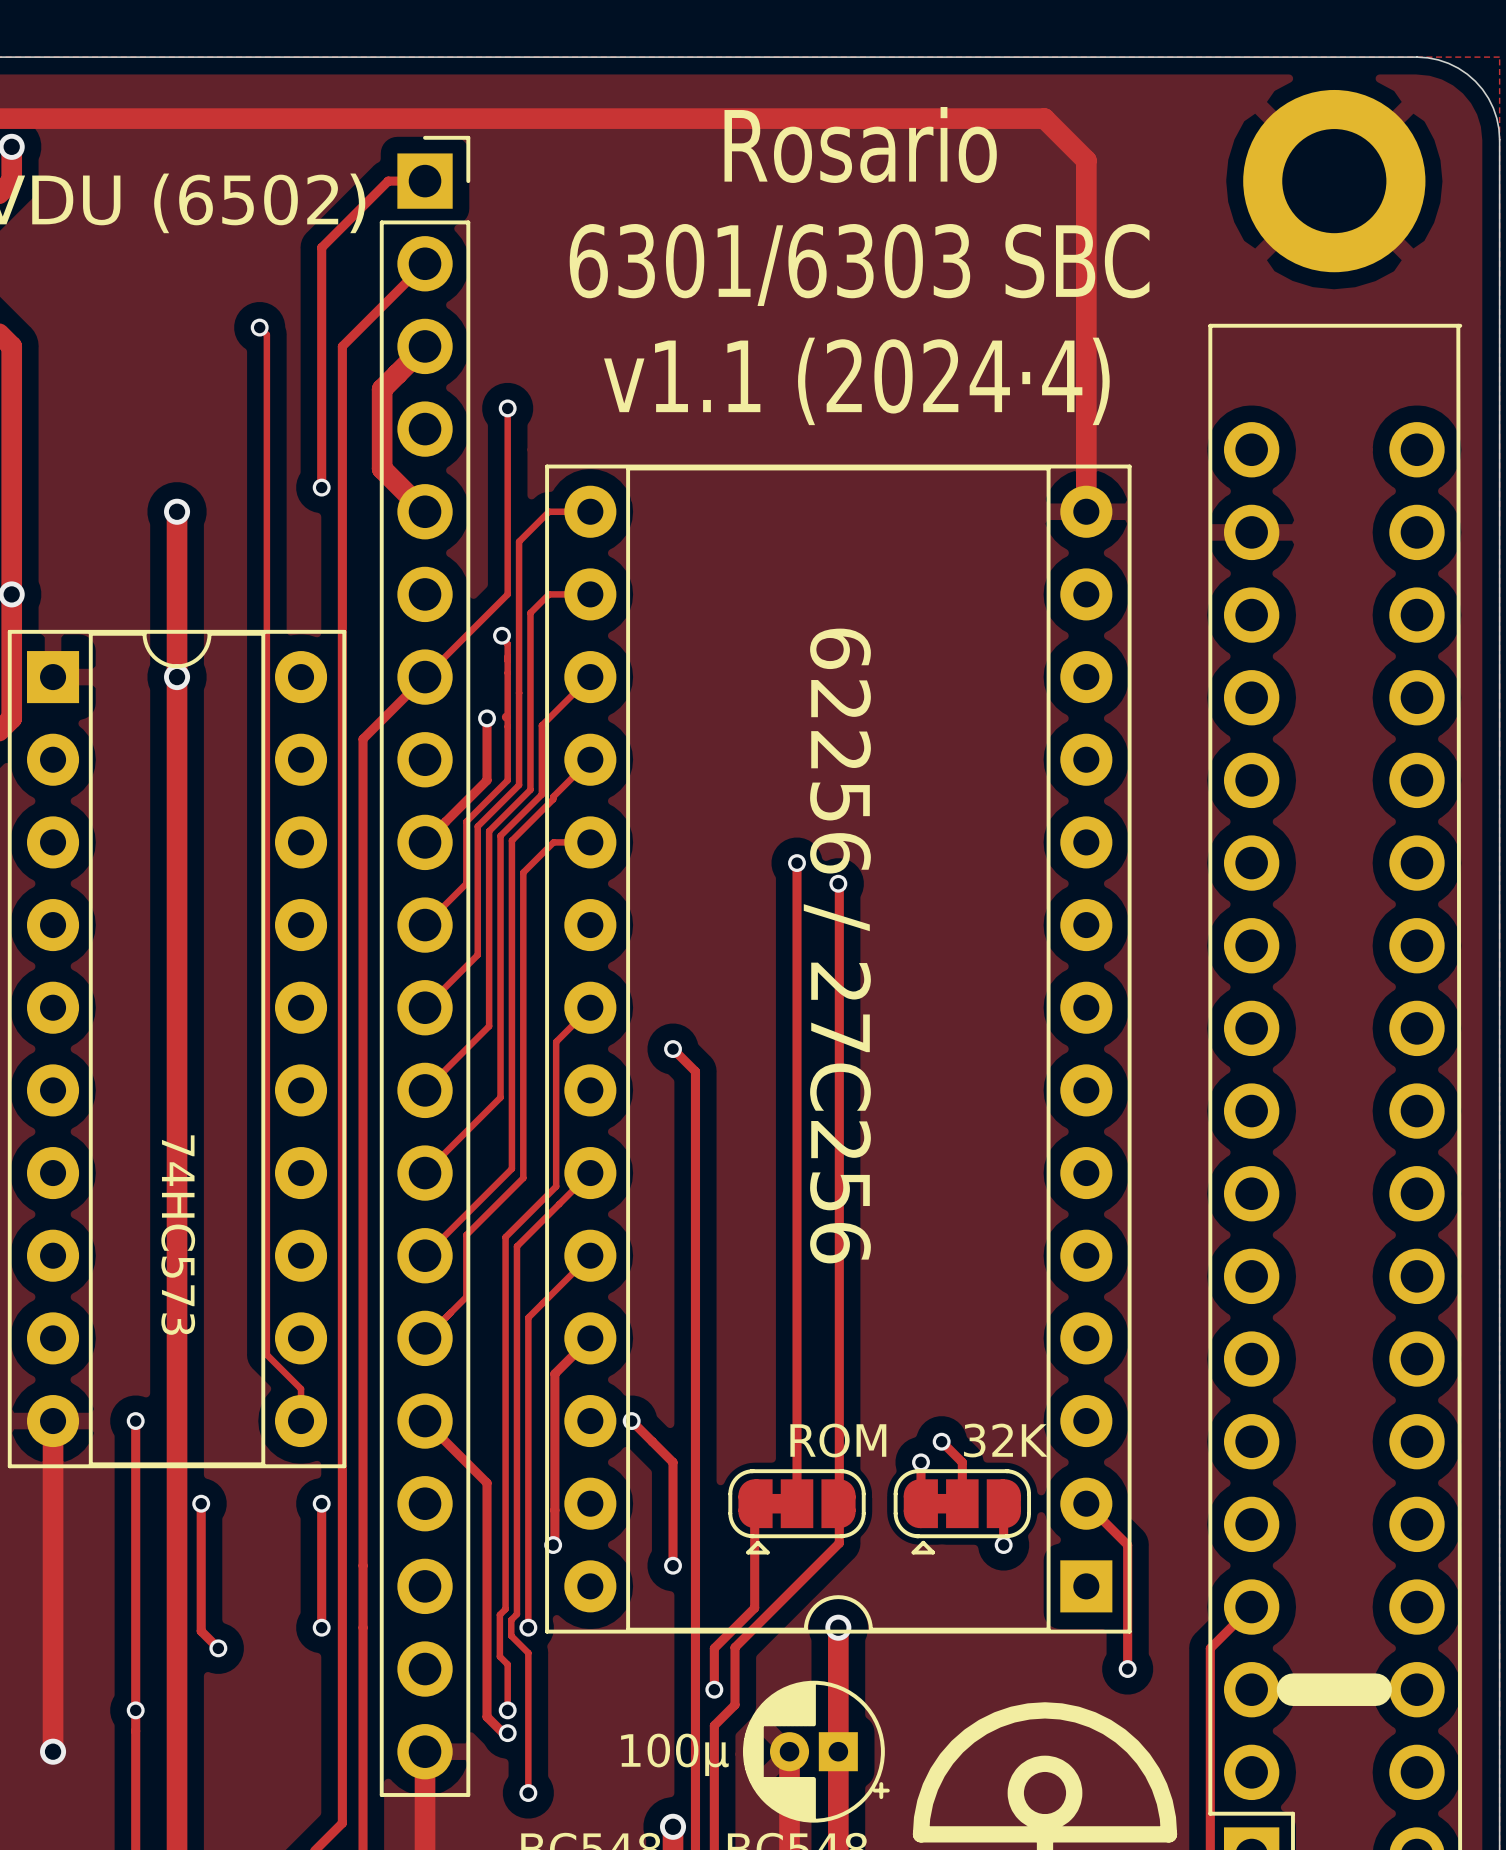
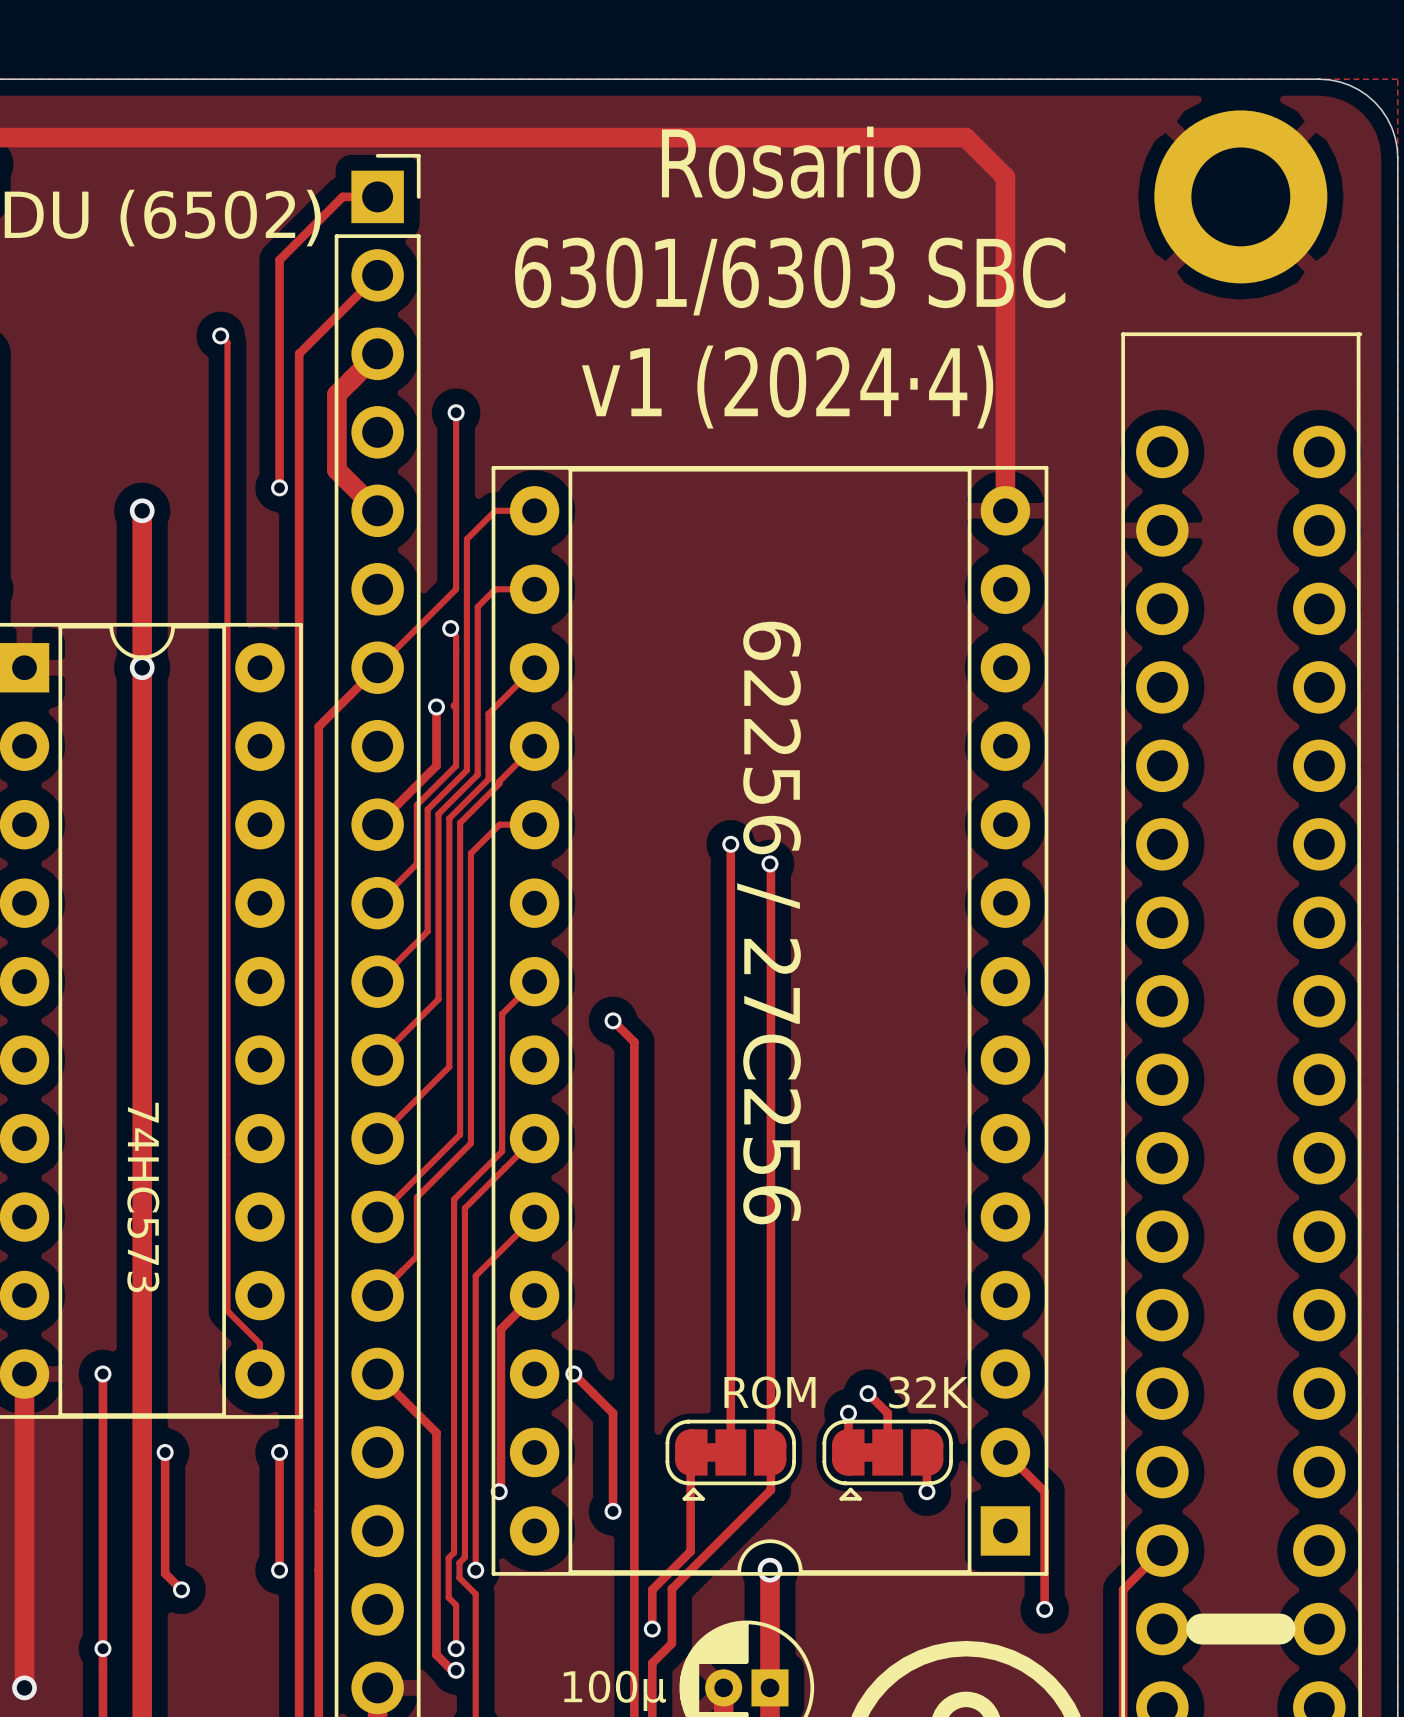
text: v1.1 (2024·4) (856, 381) -> v1 (2024·4) (787, 387)

